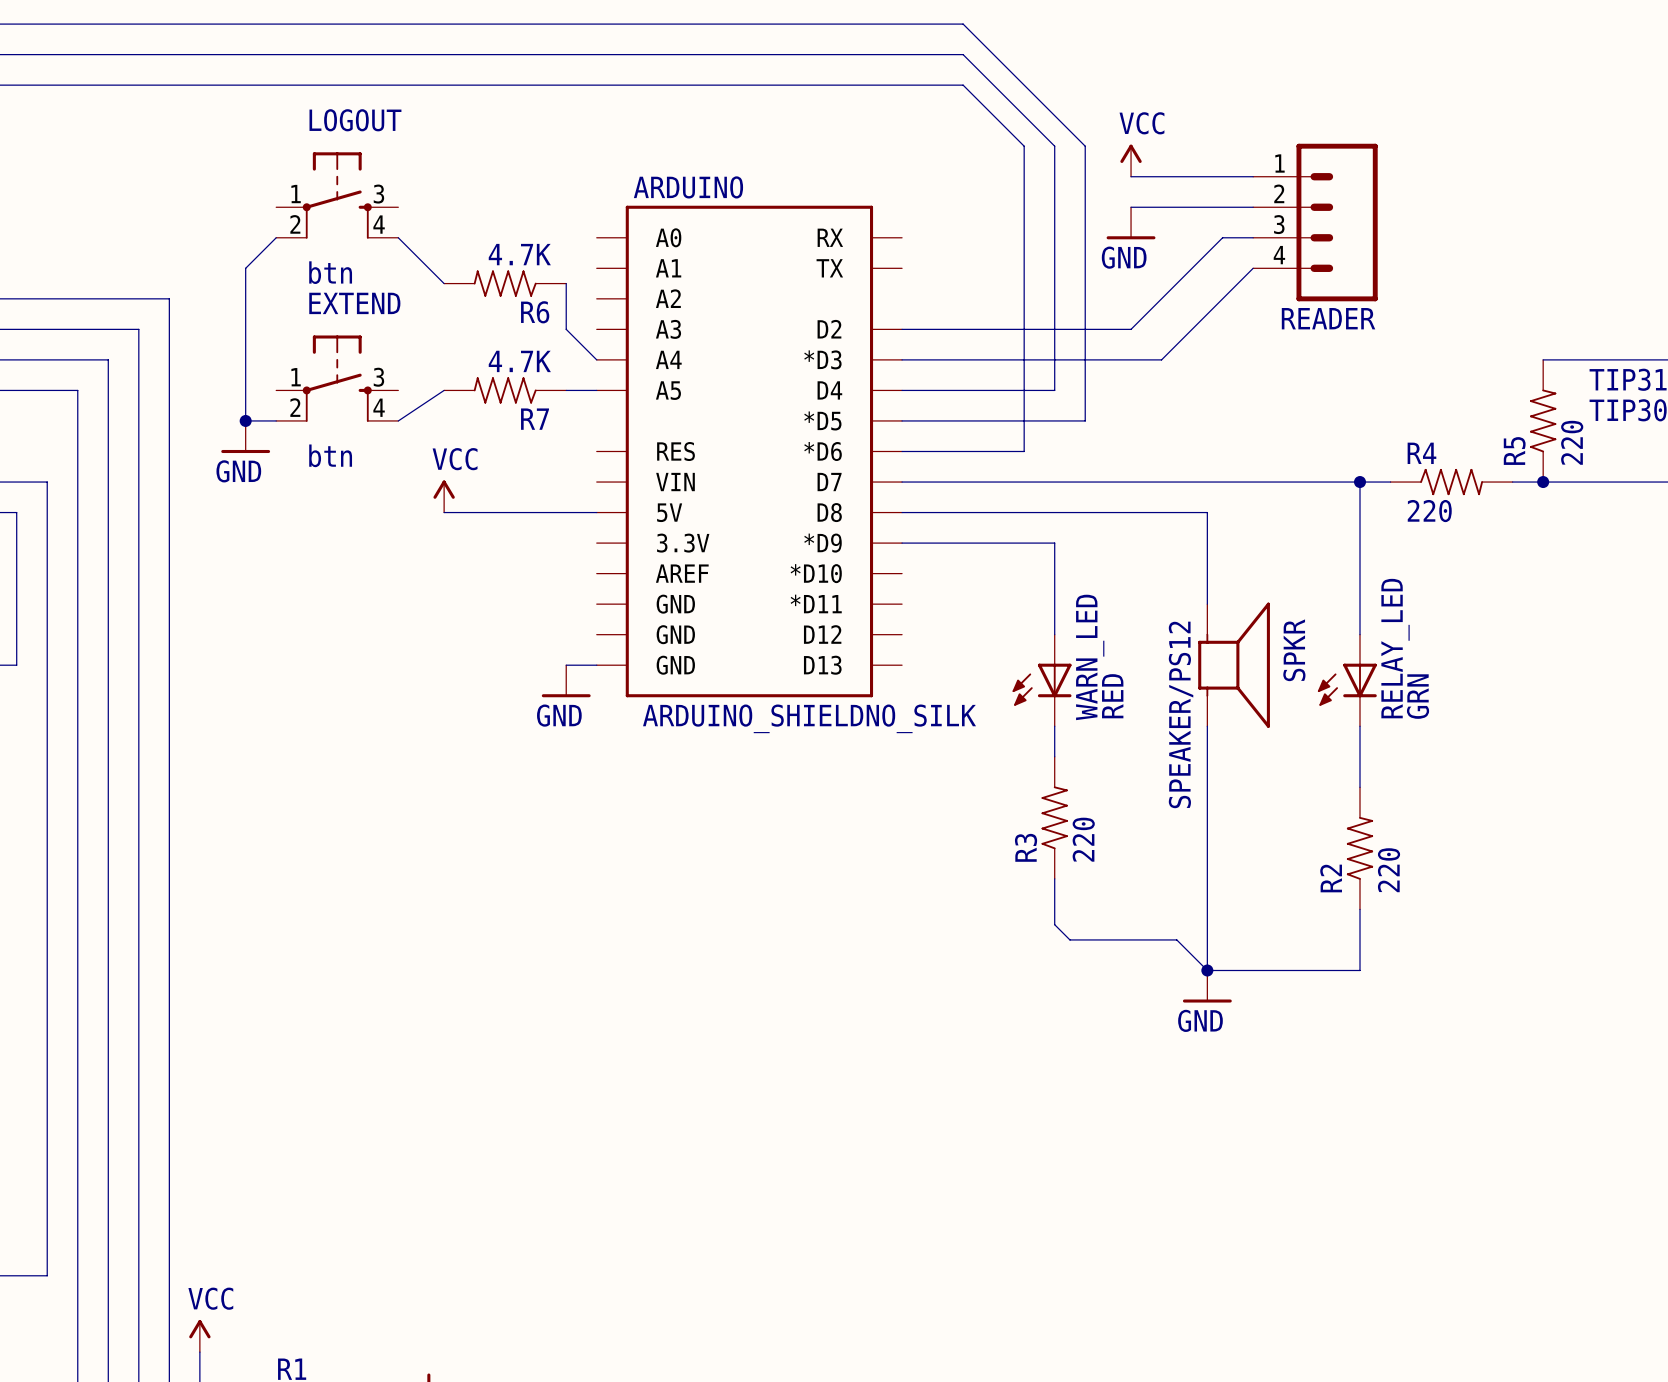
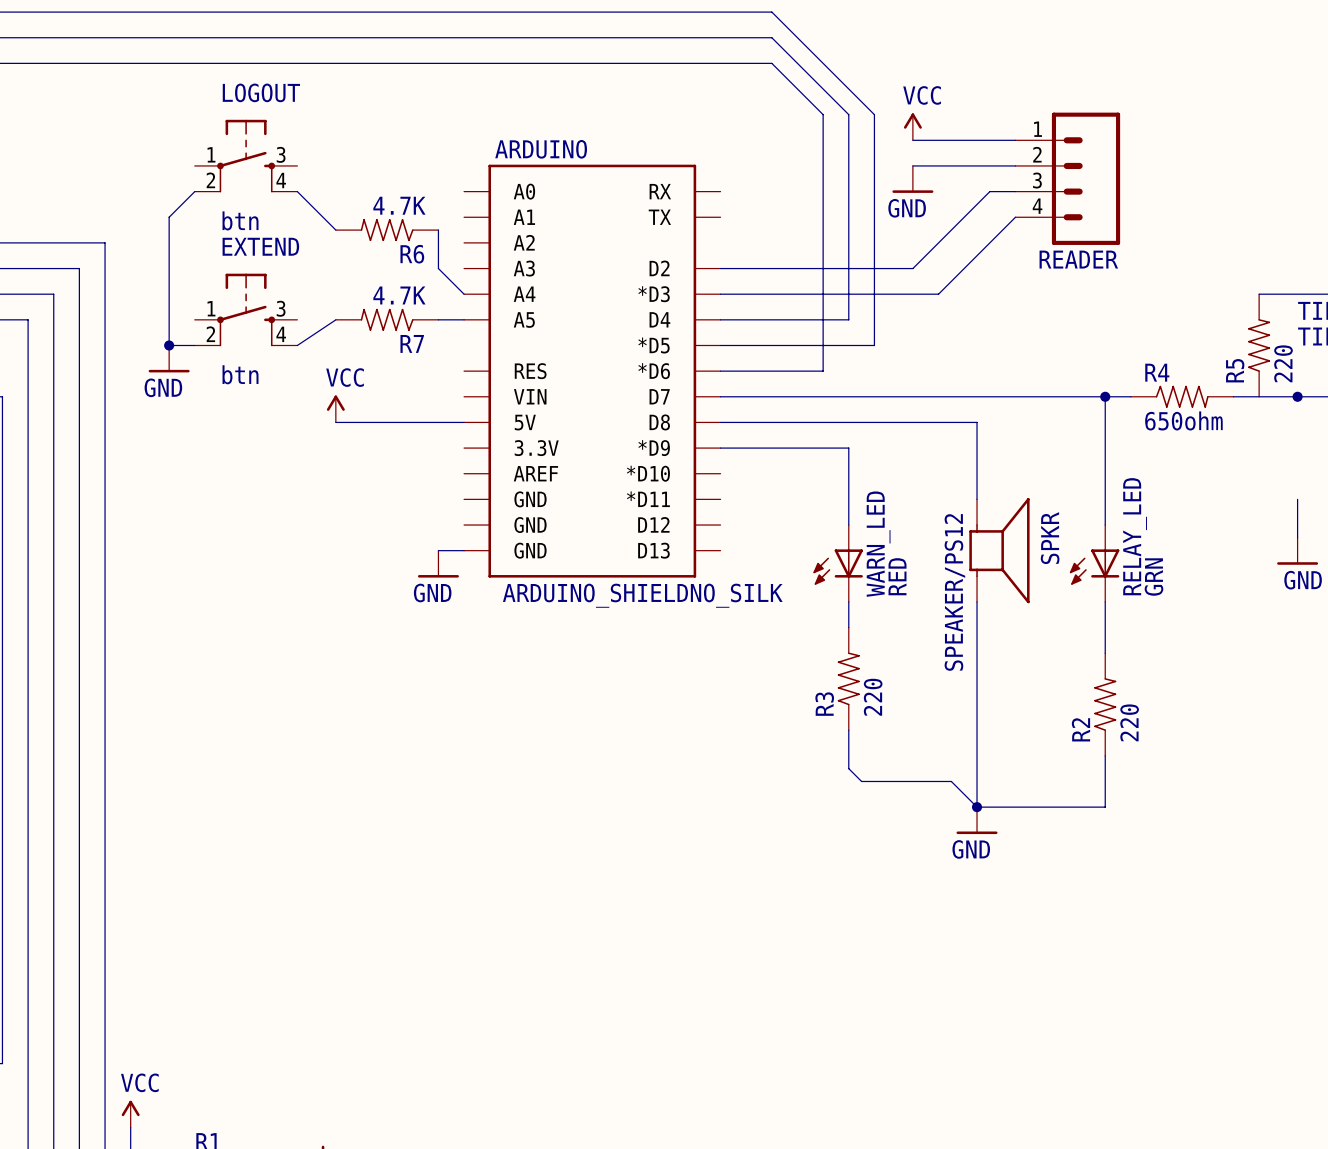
junction position: (1543, 482) -> (1297, 396)
R4 value: 220 (1429, 511) -> 650ohm (1183, 420)
wire: none -> (1297, 499) (1297, 537)
power symbol: none -> GND (1297, 551)

